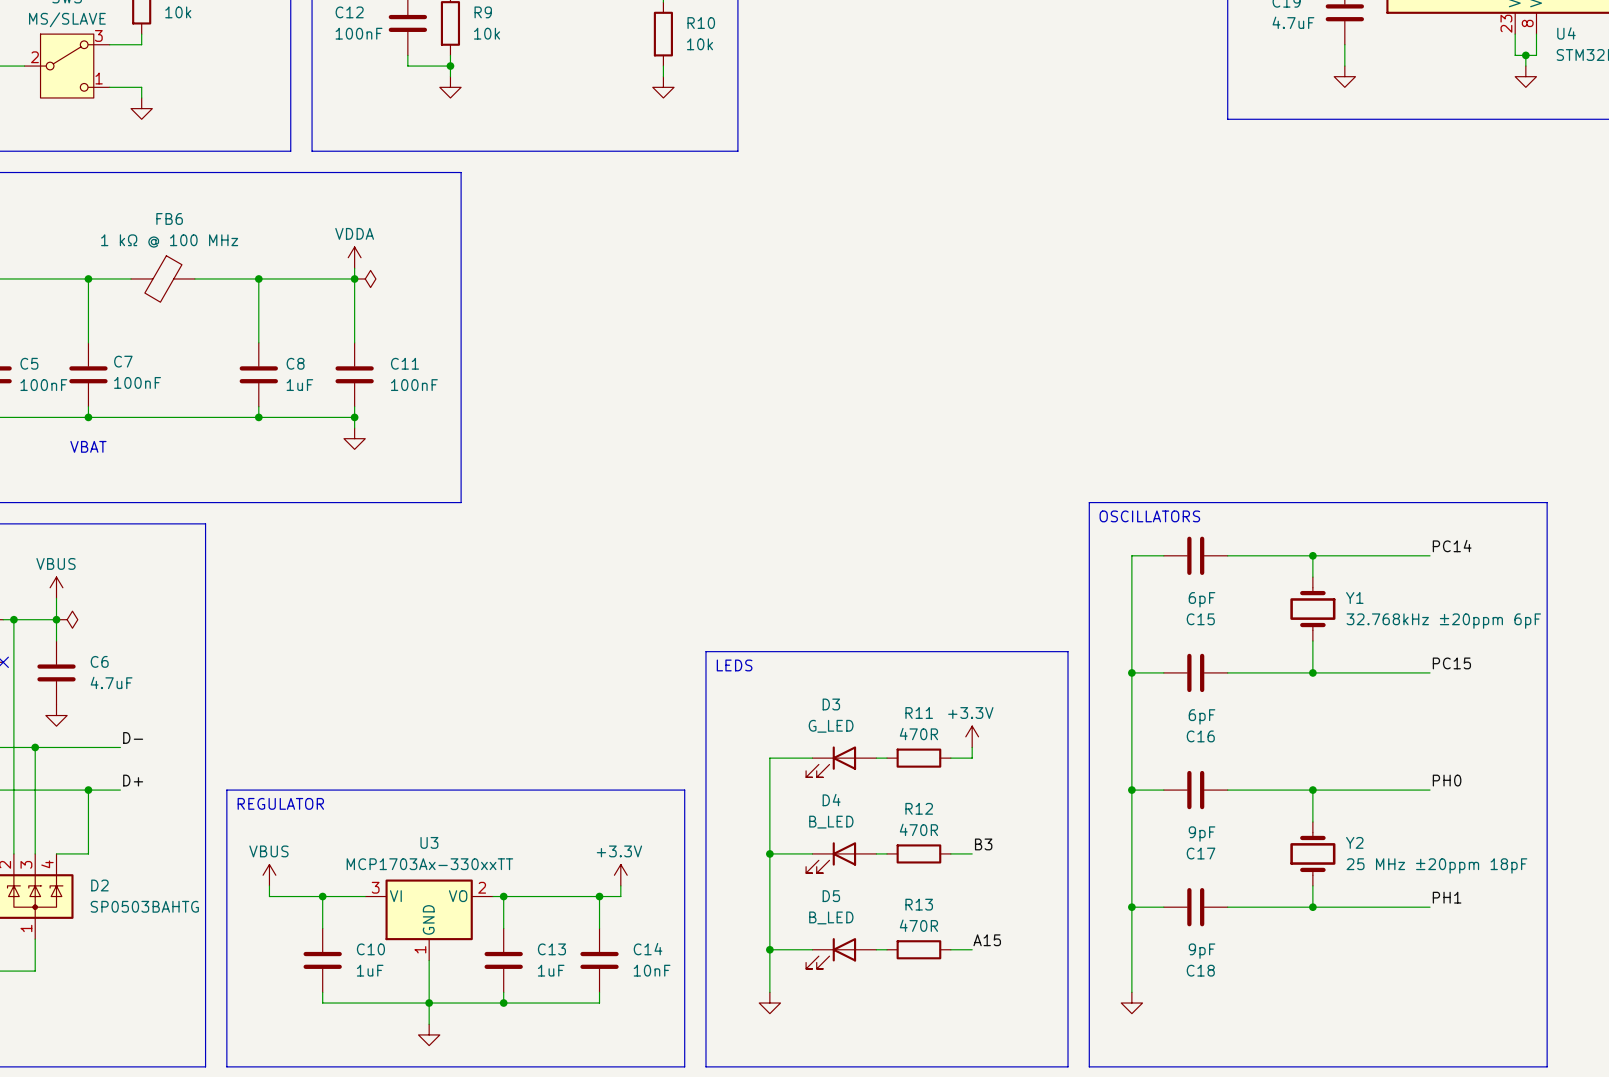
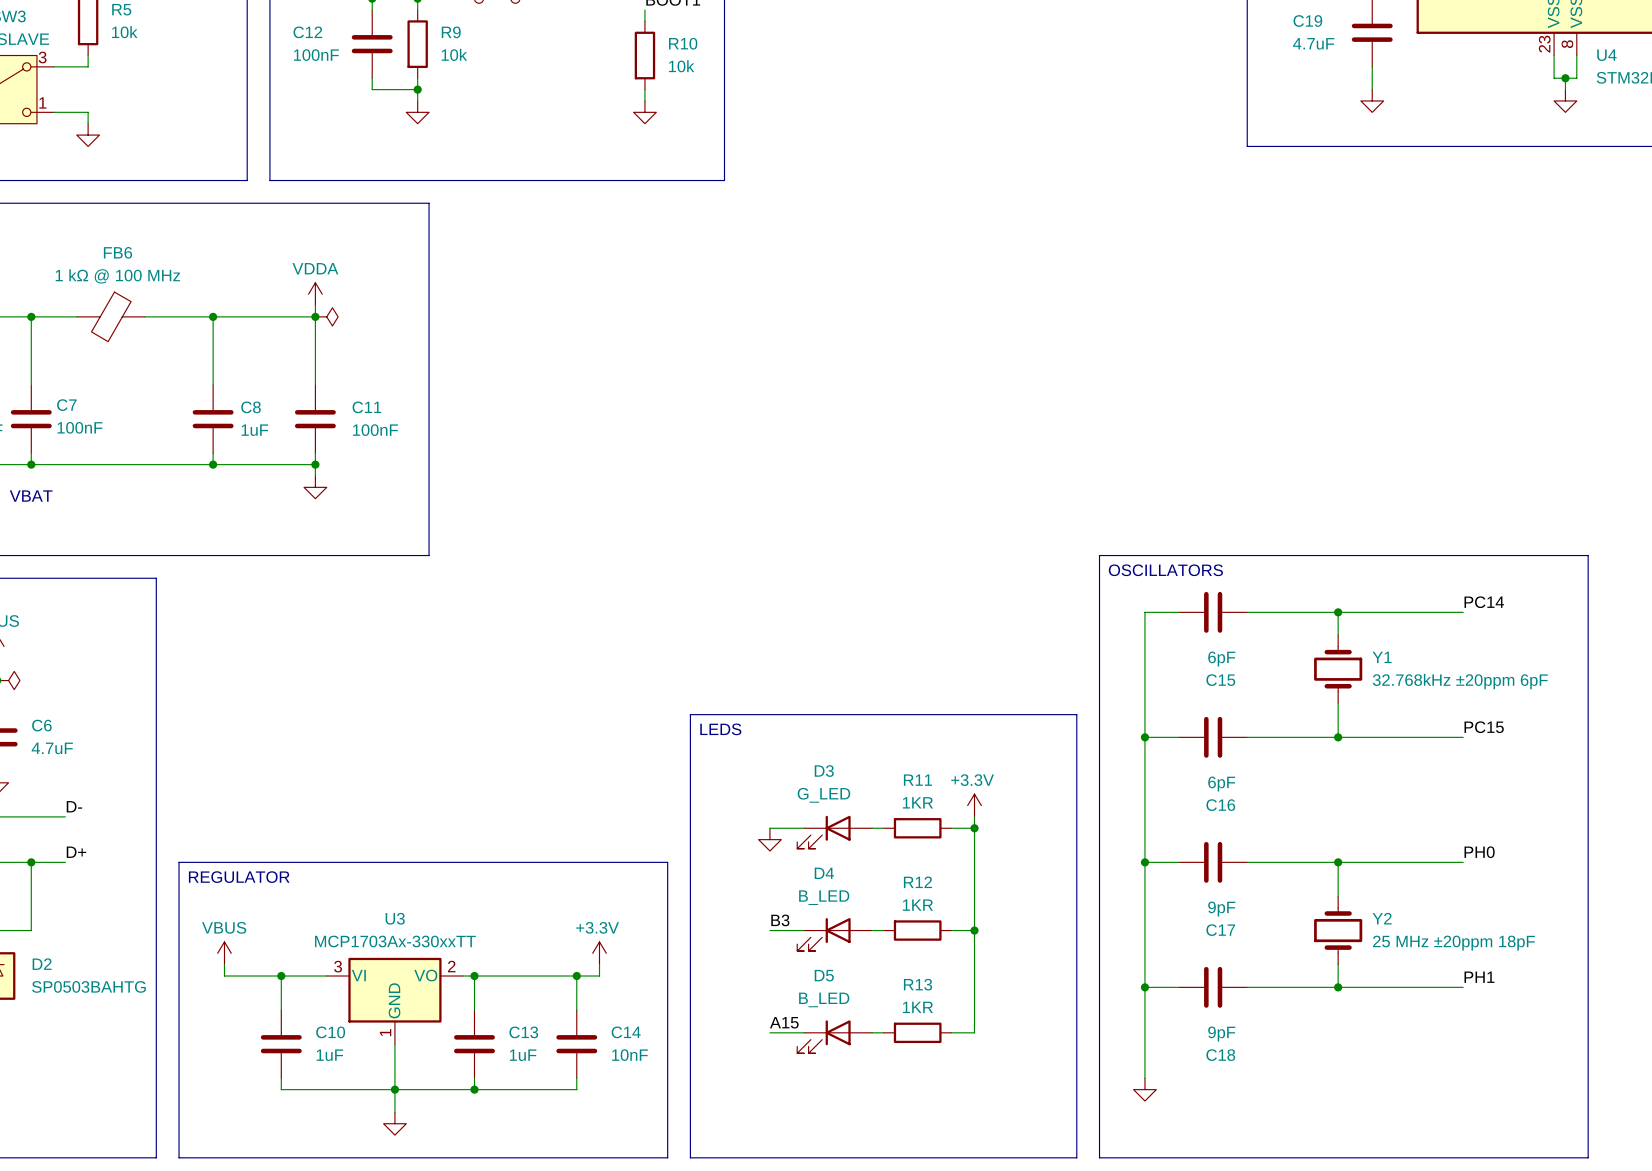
R11 value: 470R (918, 734) -> 1KR (917, 802)
wire: (780, 758) (769, 758) (769, 992) -> none
wire: none -> (974, 828) (974, 1032)
junction: none -> (974, 828)
power symbol: none -> (769, 839)
R12 value: 470R (918, 829) -> 1KR (917, 905)
label position: B3 (983, 844) -> B3 (780, 920)
wire: (769, 853) (780, 853) -> none
junction: (769, 853) -> none
junction: none -> (974, 930)
R13 value: 470R (918, 925) -> 1KR (917, 1007)
label position: A15 (987, 940) -> A15 (784, 1022)
wire: (769, 949) (780, 949) -> none
junction: (769, 949) -> none
power symbol: (769, 1003) -> none

